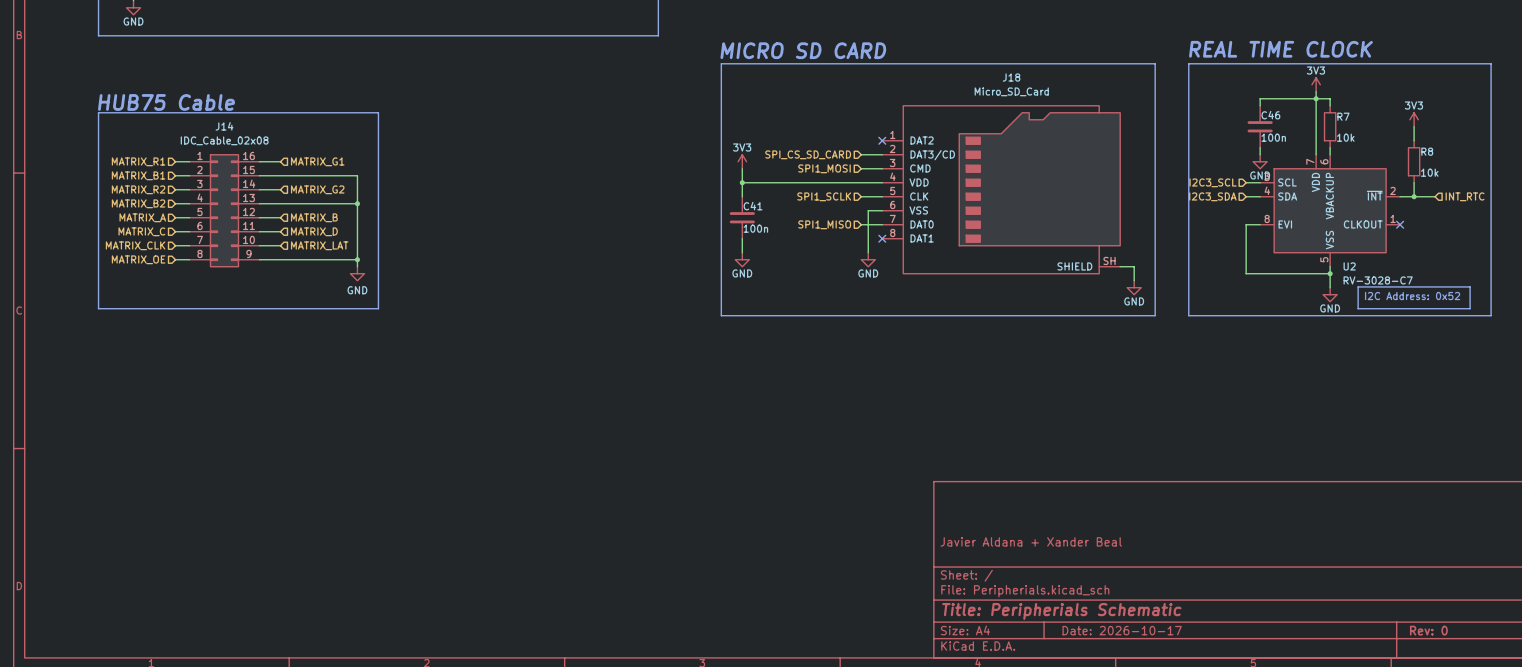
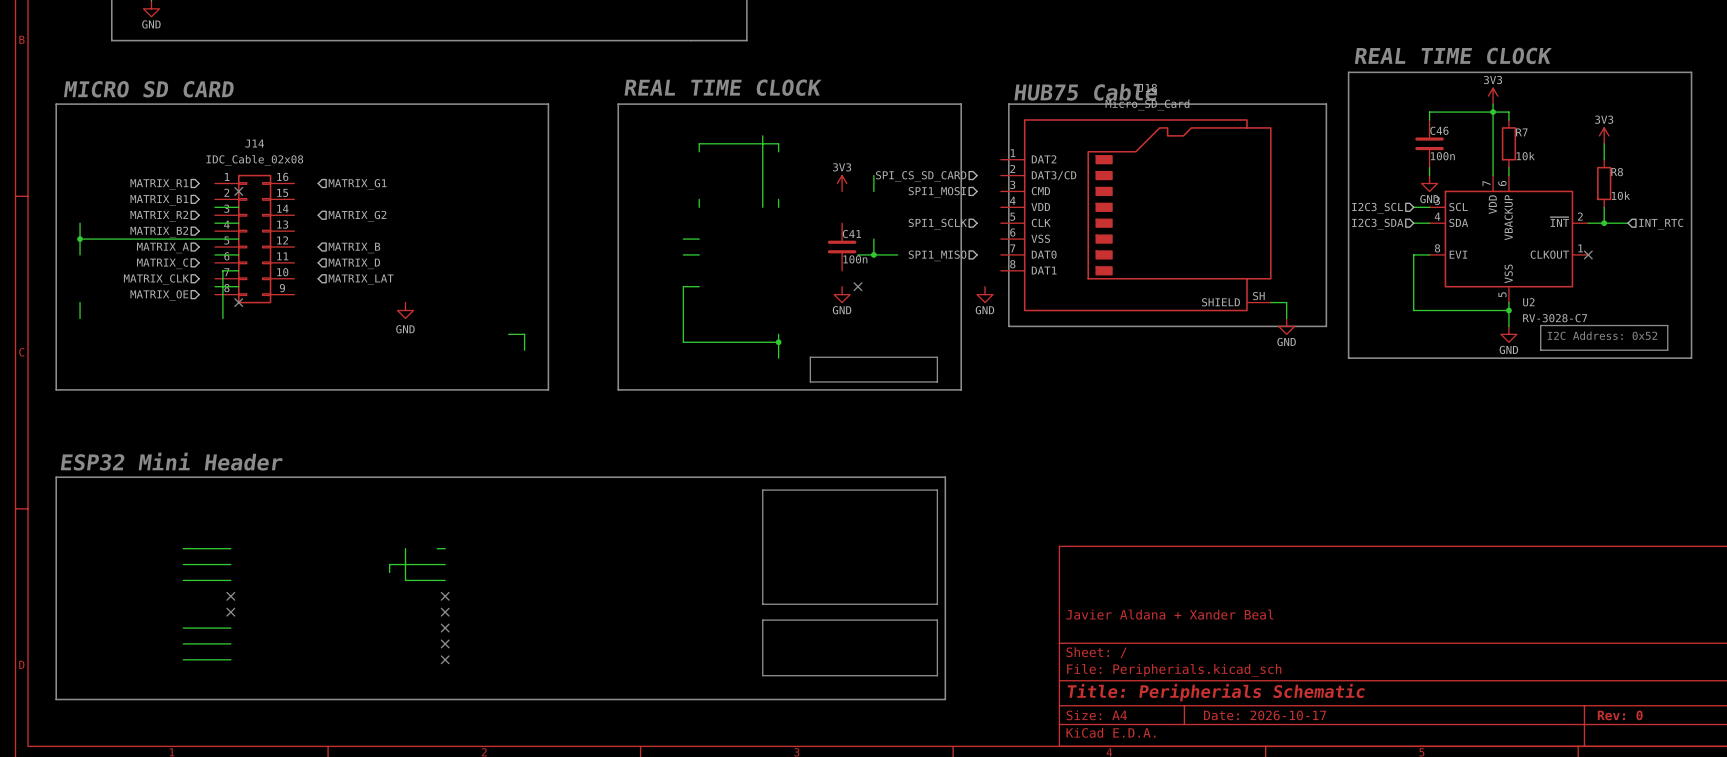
text: MICRO SD CARD (803, 50) -> none
line: (721, 63) (1155, 63) (1155, 315) (721, 315) (721, 63) -> none
text: none -> REAL TIME CLOCK (723, 87)
text: none -> MICRO SD CARD (149, 89)
text: none -> HUB75 Cable (1085, 92)
line: none -> (618, 104) (961, 104) (961, 389) (618, 389) (618, 104)
line: none -> (1008, 104) (1326, 104) (1326, 326) (1008, 326) (1008, 104)
text: HUB75 Cable (166, 102) -> none
line: (98, 112) (378, 112) (378, 308) (98, 308) (98, 112) -> (56, 104) (56, 389) (548, 389) (548, 104) (56, 104)
wire: none -> (762, 135) (762, 207)
wire: none -> (699, 151) (699, 143) (778, 143) (778, 151)
no-connect mark: (882, 140) -> none
wire: none -> (873, 175) (873, 191)
wire: (861, 154) (882, 154) -> none
wire: (175, 161) (189, 161) -> none
wire: (259, 161) (280, 161) -> (214, 207) (238, 207)
no-connect mark: none -> (238, 191)
wire: (742, 168) (742, 196) -> none
wire: (861, 168) (882, 168) -> none
wire: (175, 175) (189, 175) -> none
wire: (259, 175) (357, 175) (357, 266) -> none
wire: none -> (699, 199) (699, 207)
wire: none -> (778, 199) (778, 207)
wire: (742, 182) (882, 182) -> none
junction: (742, 182) -> none
wire: (175, 189) (189, 189) -> none
wire: (259, 189) (280, 189) -> (214, 223) (238, 223)
wire: none -> (80, 223) (80, 254)
wire: (861, 196) (882, 196) -> none
wire: (175, 203) (189, 203) -> none
wire: (259, 203) (357, 203) -> none
junction: (357, 203) -> none
wire: none -> (80, 239) (238, 239)
junction: none -> (80, 239)
wire: none -> (683, 239) (699, 239)
wire: (882, 210) (868, 210) (868, 252) -> none
wire: (175, 217) (189, 217) -> none
wire: (259, 217) (280, 217) -> (214, 254) (238, 254)
wire: none -> (683, 254) (699, 254)
wire: none -> (858, 254) (897, 254)
junction: none -> (873, 254)
wire: (861, 224) (882, 224) -> none
wire: (175, 231) (189, 231) -> none
wire: (259, 231) (280, 231) -> none
wire: none -> (238, 270) (222, 270) (222, 318)
wire: (742, 238) (742, 252) -> (873, 239) (873, 254)
no-connect mark: (882, 238) -> none
wire: (175, 245) (189, 245) -> none
wire: (259, 245) (280, 245) -> (214, 286) (238, 286)
wire: none -> (699, 286) (683, 286) (683, 342) (778, 342)
no-connect mark: none -> (858, 286)
wire: (175, 259) (189, 259) -> none
wire: (259, 259) (357, 259) -> none
junction: (357, 259) -> none
wire: none -> (80, 302) (80, 318)
no-connect mark: none -> (238, 302)
wire: none -> (508, 334) (524, 334) (524, 350)
wire: none -> (778, 334) (778, 358)
junction: none -> (778, 342)
line: none -> (810, 357) (937, 357) (937, 381) (810, 381) (810, 357)
text: none -> ESP32 Mini Header (171, 461)
line: none -> (56, 477) (56, 699) (945, 699) (945, 477) (56, 477)
line: none -> (762, 490) (762, 604) (937, 604) (937, 490) (762, 490)
wire: none -> (183, 548) (230, 548)
wire: none -> (405, 548) (405, 580) (445, 580)
wire: none -> (437, 548) (445, 548)
wire: none -> (183, 564) (230, 564)
wire: none -> (445, 564) (389, 564) (389, 572)
wire: none -> (183, 580) (230, 580)
no-connect mark: none -> (230, 596)
no-connect mark: none -> (445, 596)
no-connect mark: none -> (230, 612)
no-connect mark: none -> (445, 612)
line: none -> (762, 620) (937, 620) (937, 675) (762, 675) (762, 620)
wire: none -> (183, 628) (230, 628)
no-connect mark: none -> (445, 628)
wire: none -> (183, 643) (230, 643)
no-connect mark: none -> (445, 643)
wire: none -> (183, 659) (230, 659)
no-connect mark: none -> (445, 659)

